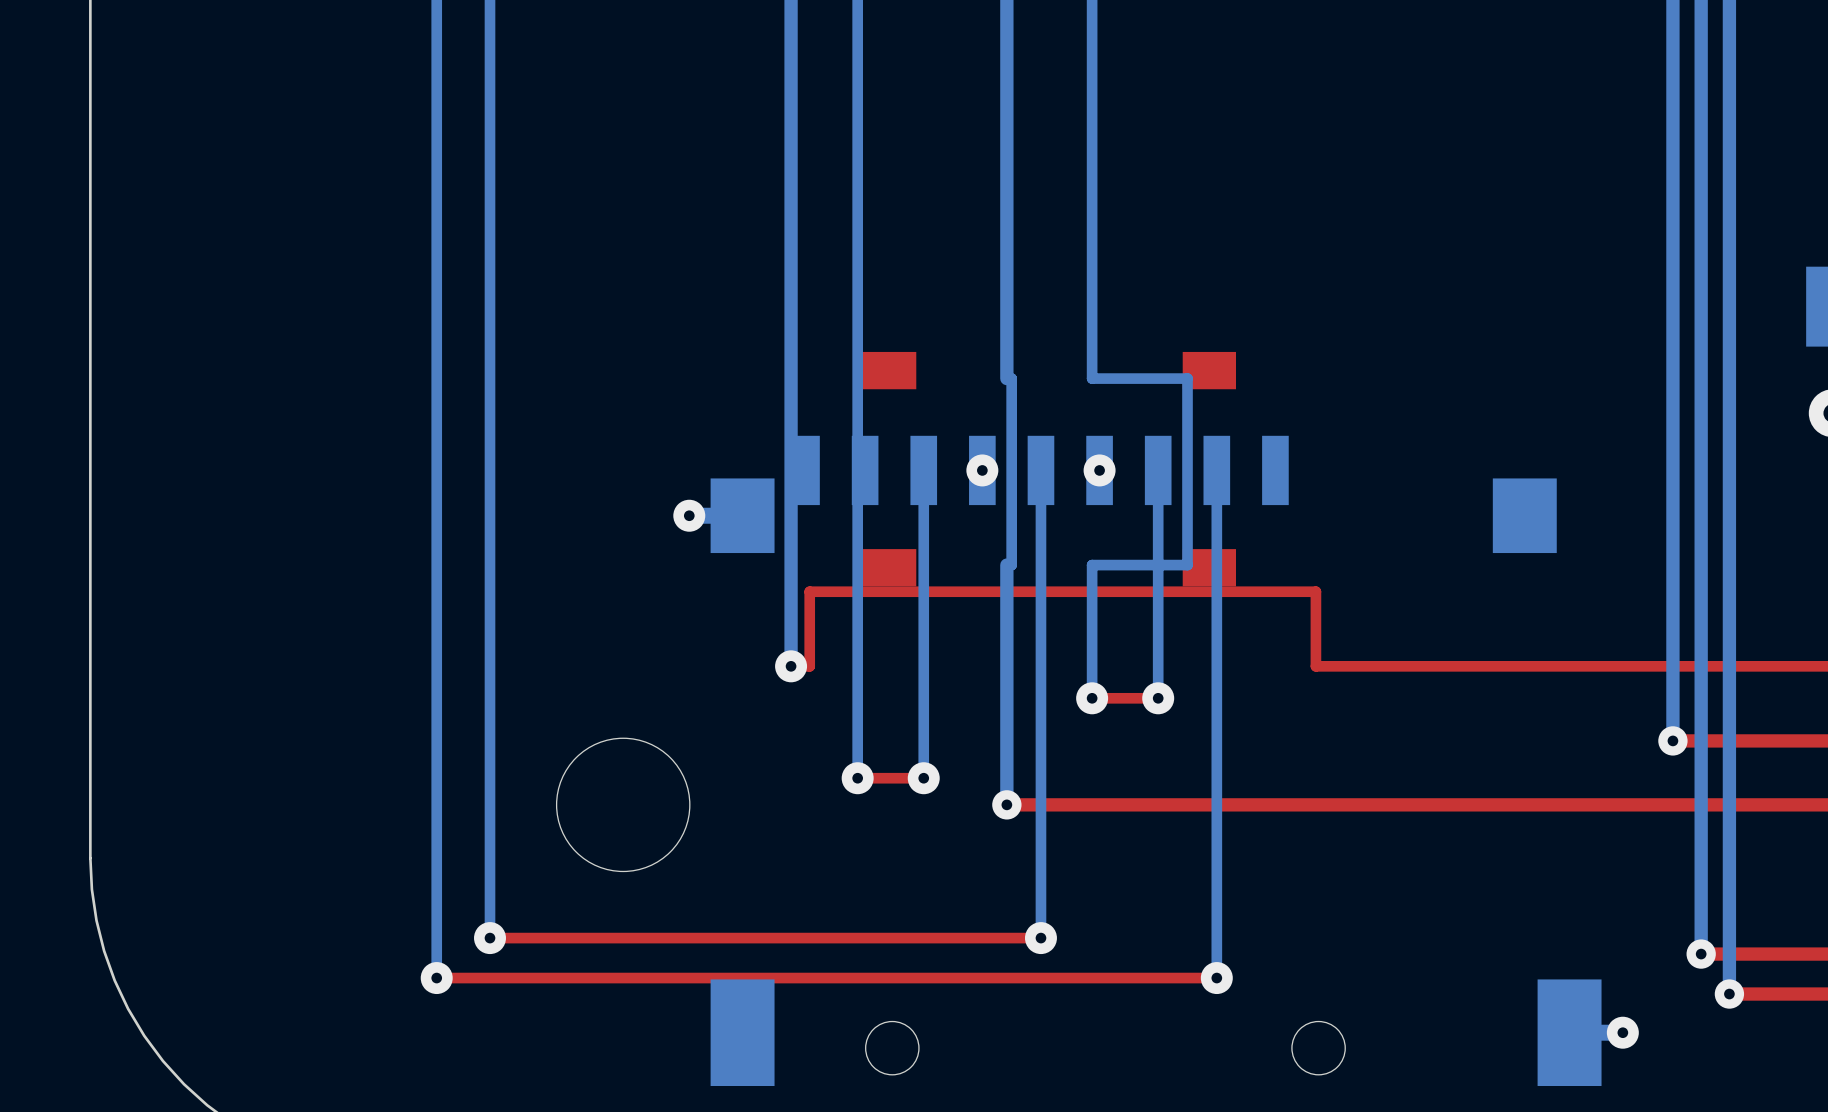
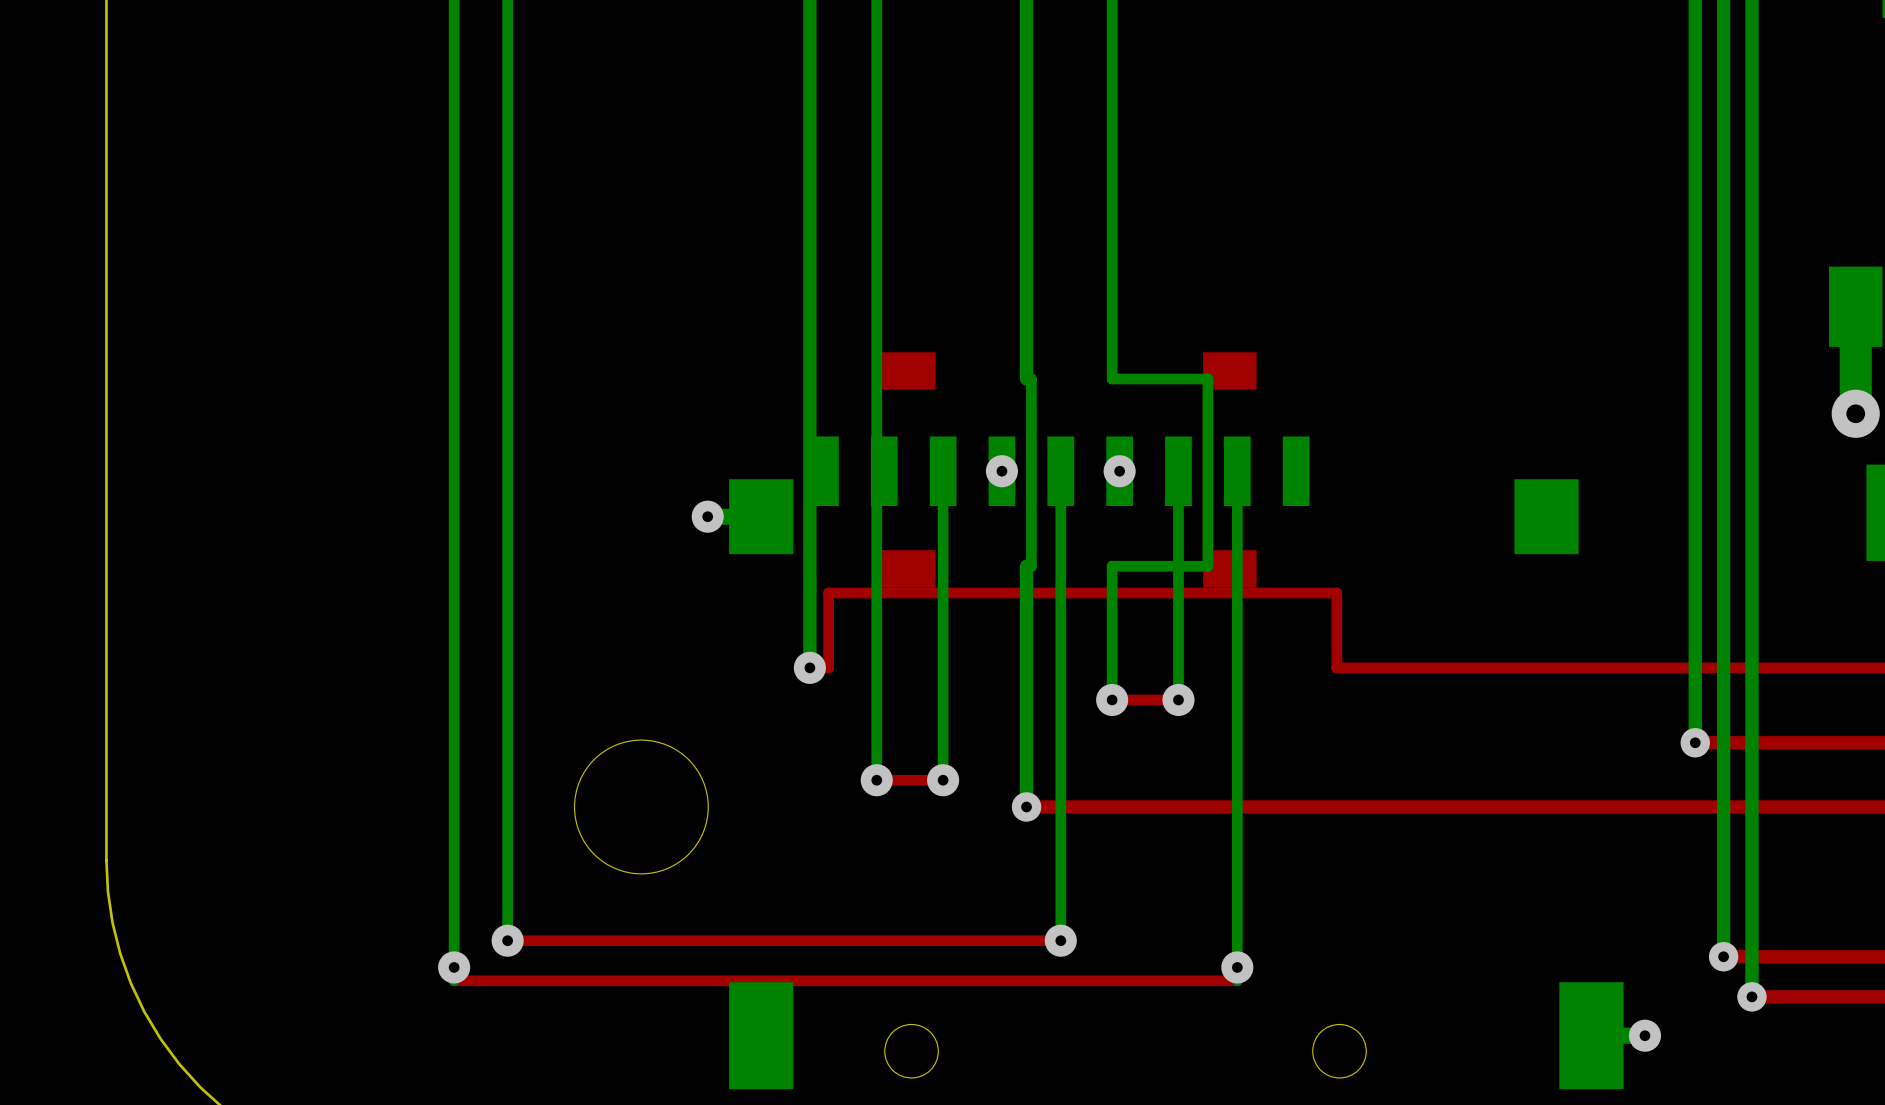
via position: (436, 978) -> (454, 967)
via position: (1216, 978) -> (1237, 967)

